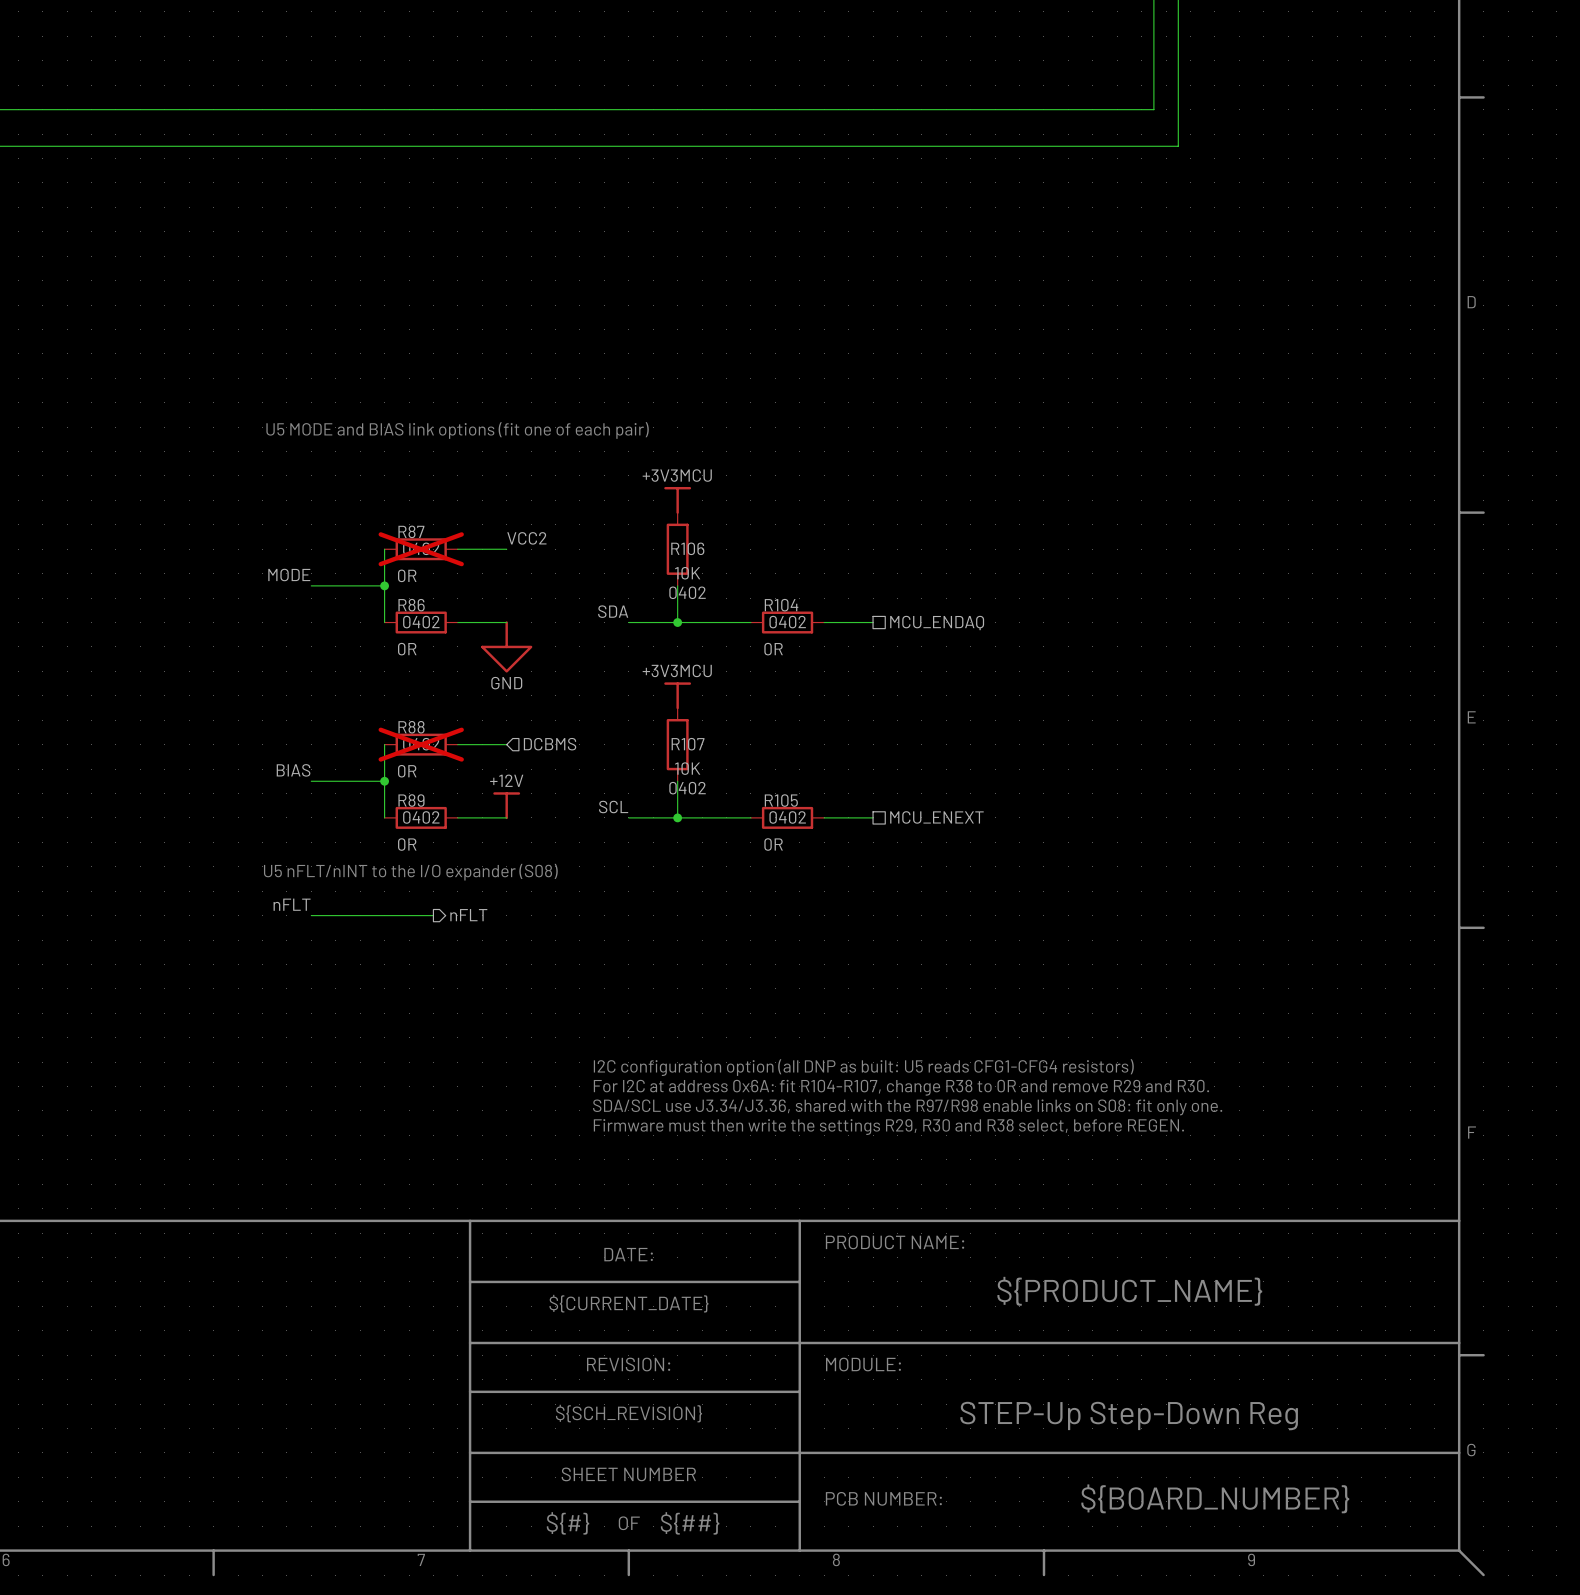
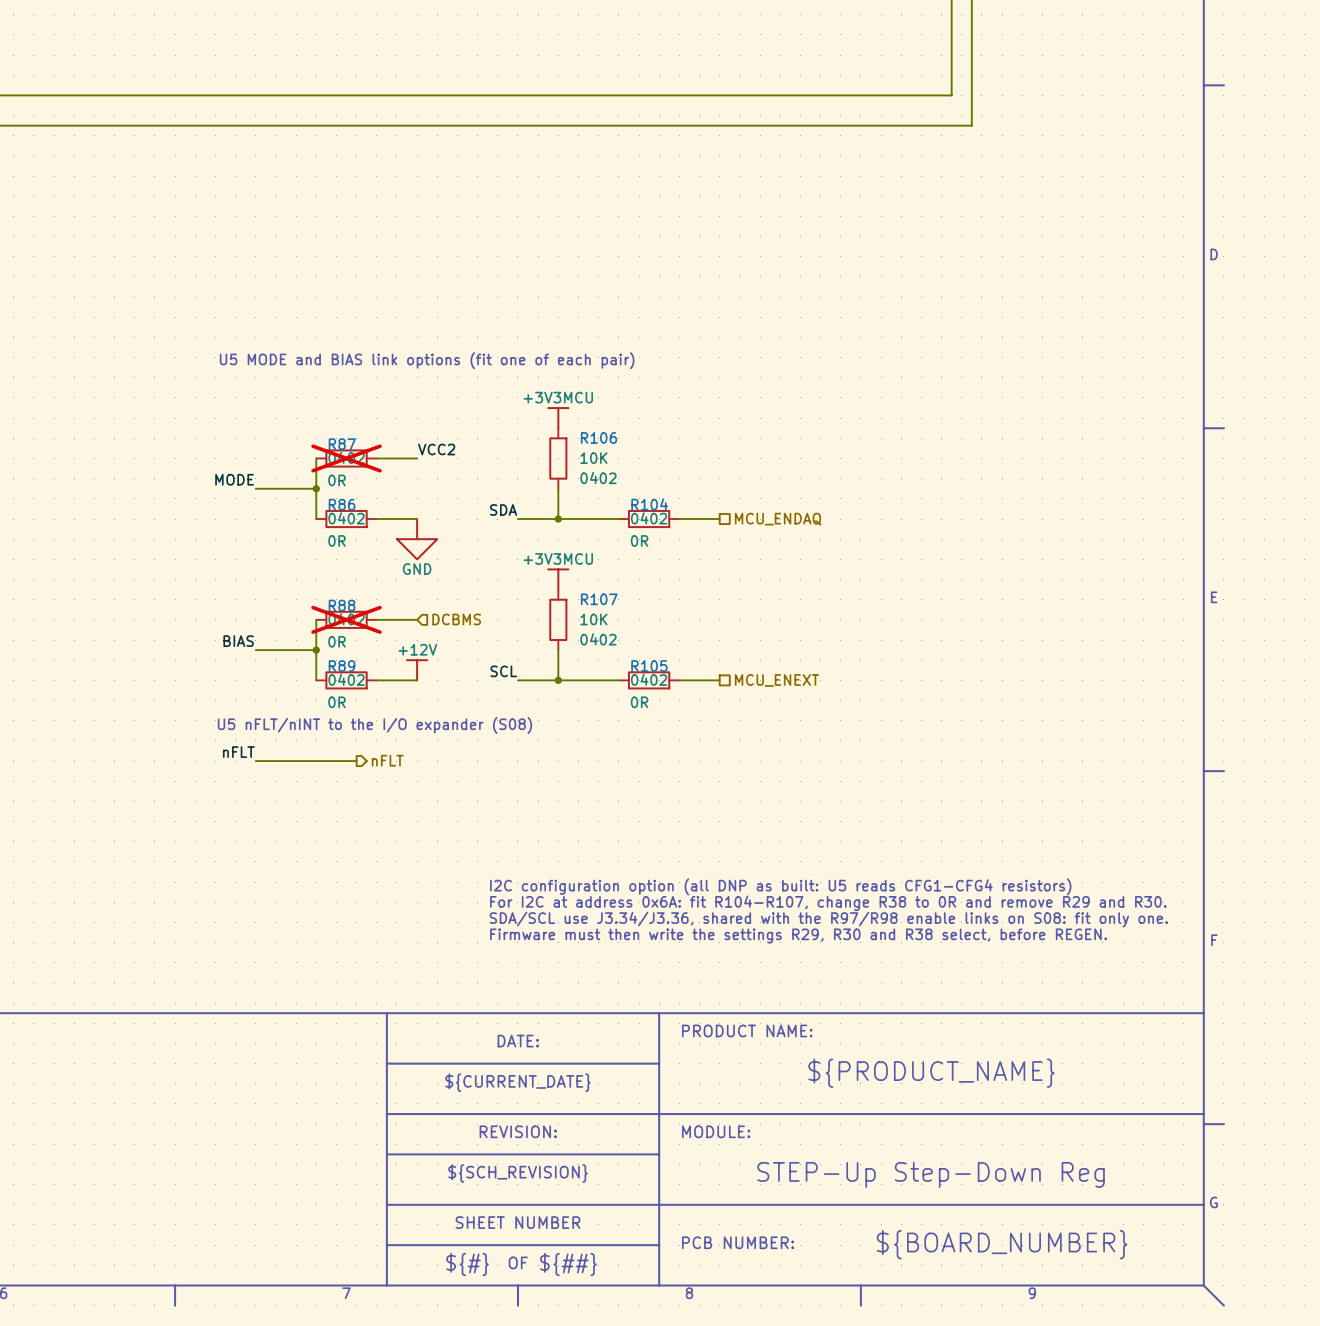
R106 name position: R106 (687, 548) -> R106 (598, 437)
R106 value position: 10K (687, 573) -> 10K (593, 458)
R106 text position: 0402 (687, 592) -> 0402 (598, 478)
R107 name position: R107 (688, 744) -> R107 (599, 599)
R107 value position: 10K (687, 768) -> 10K (593, 619)
R107 text position: 0402 (687, 788) -> 0402 (598, 639)

